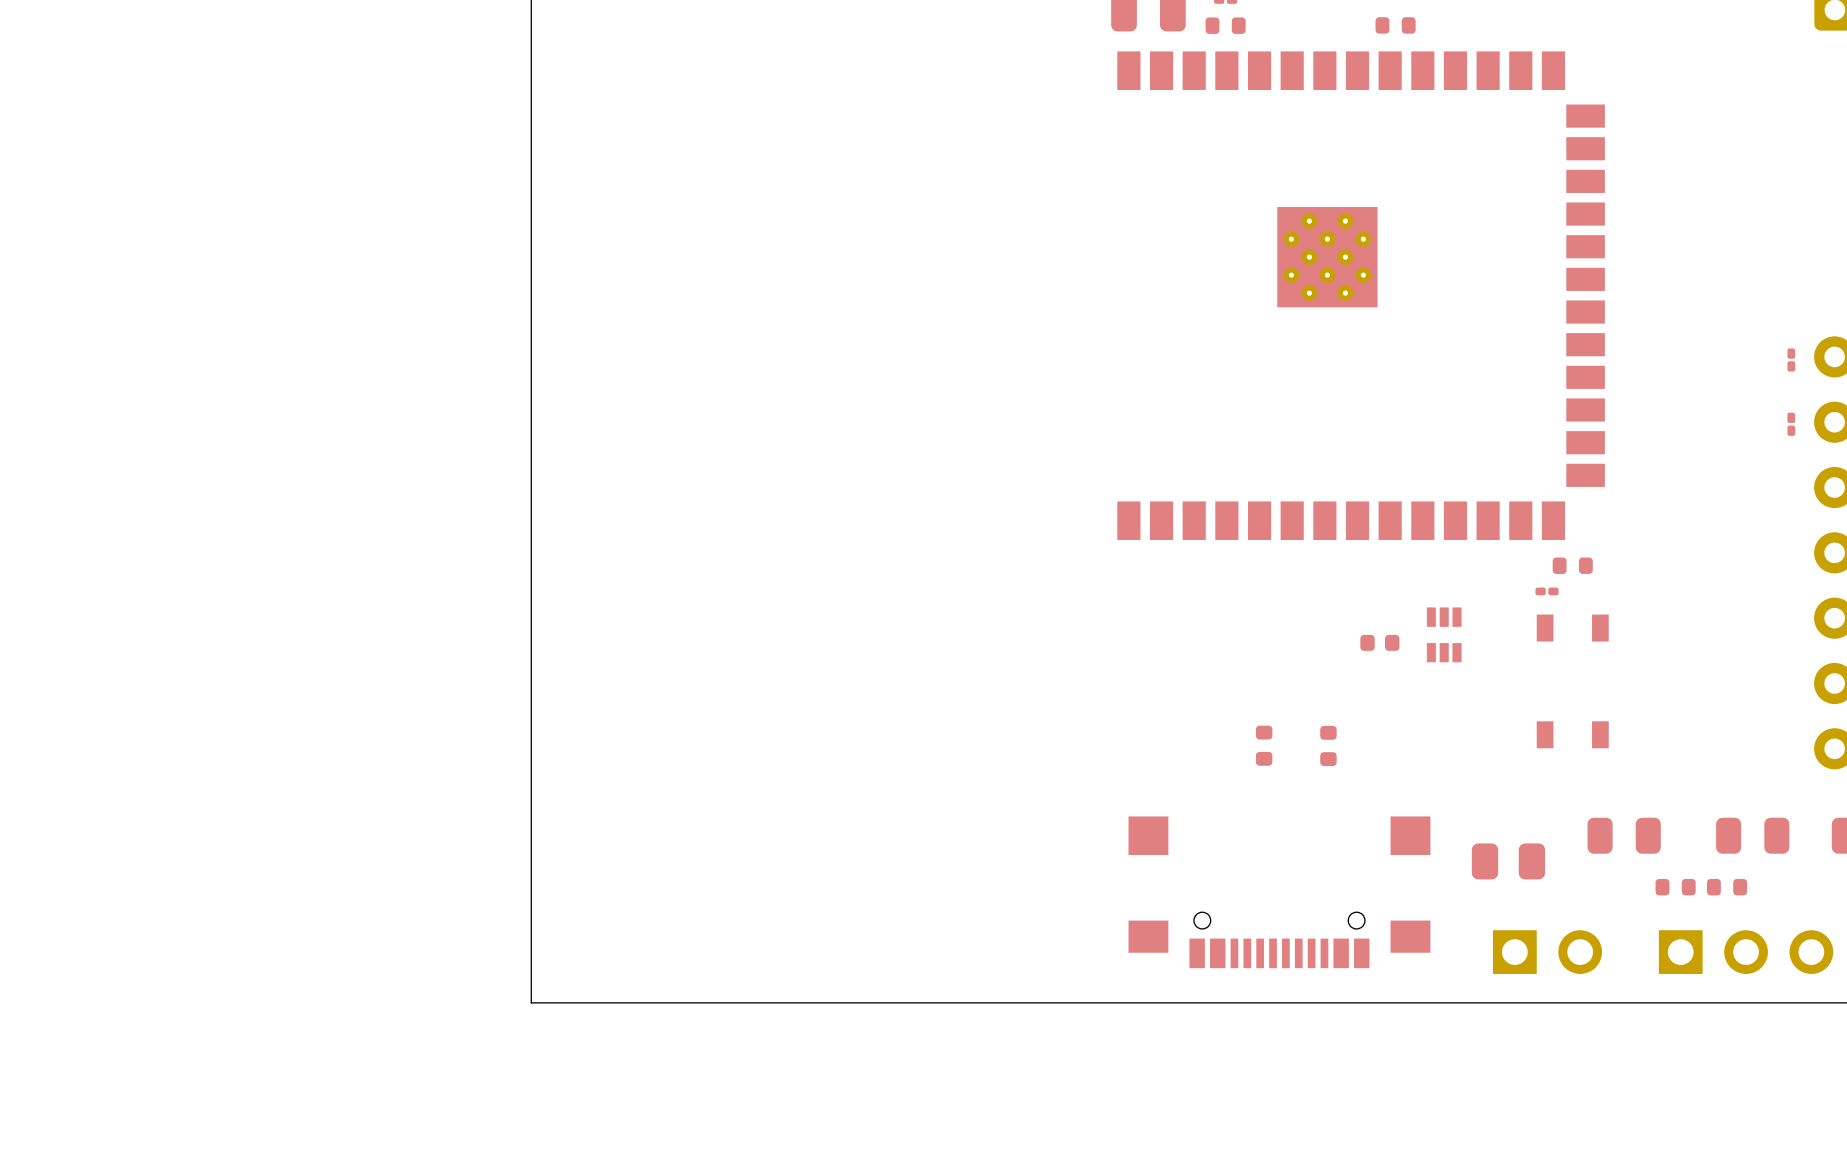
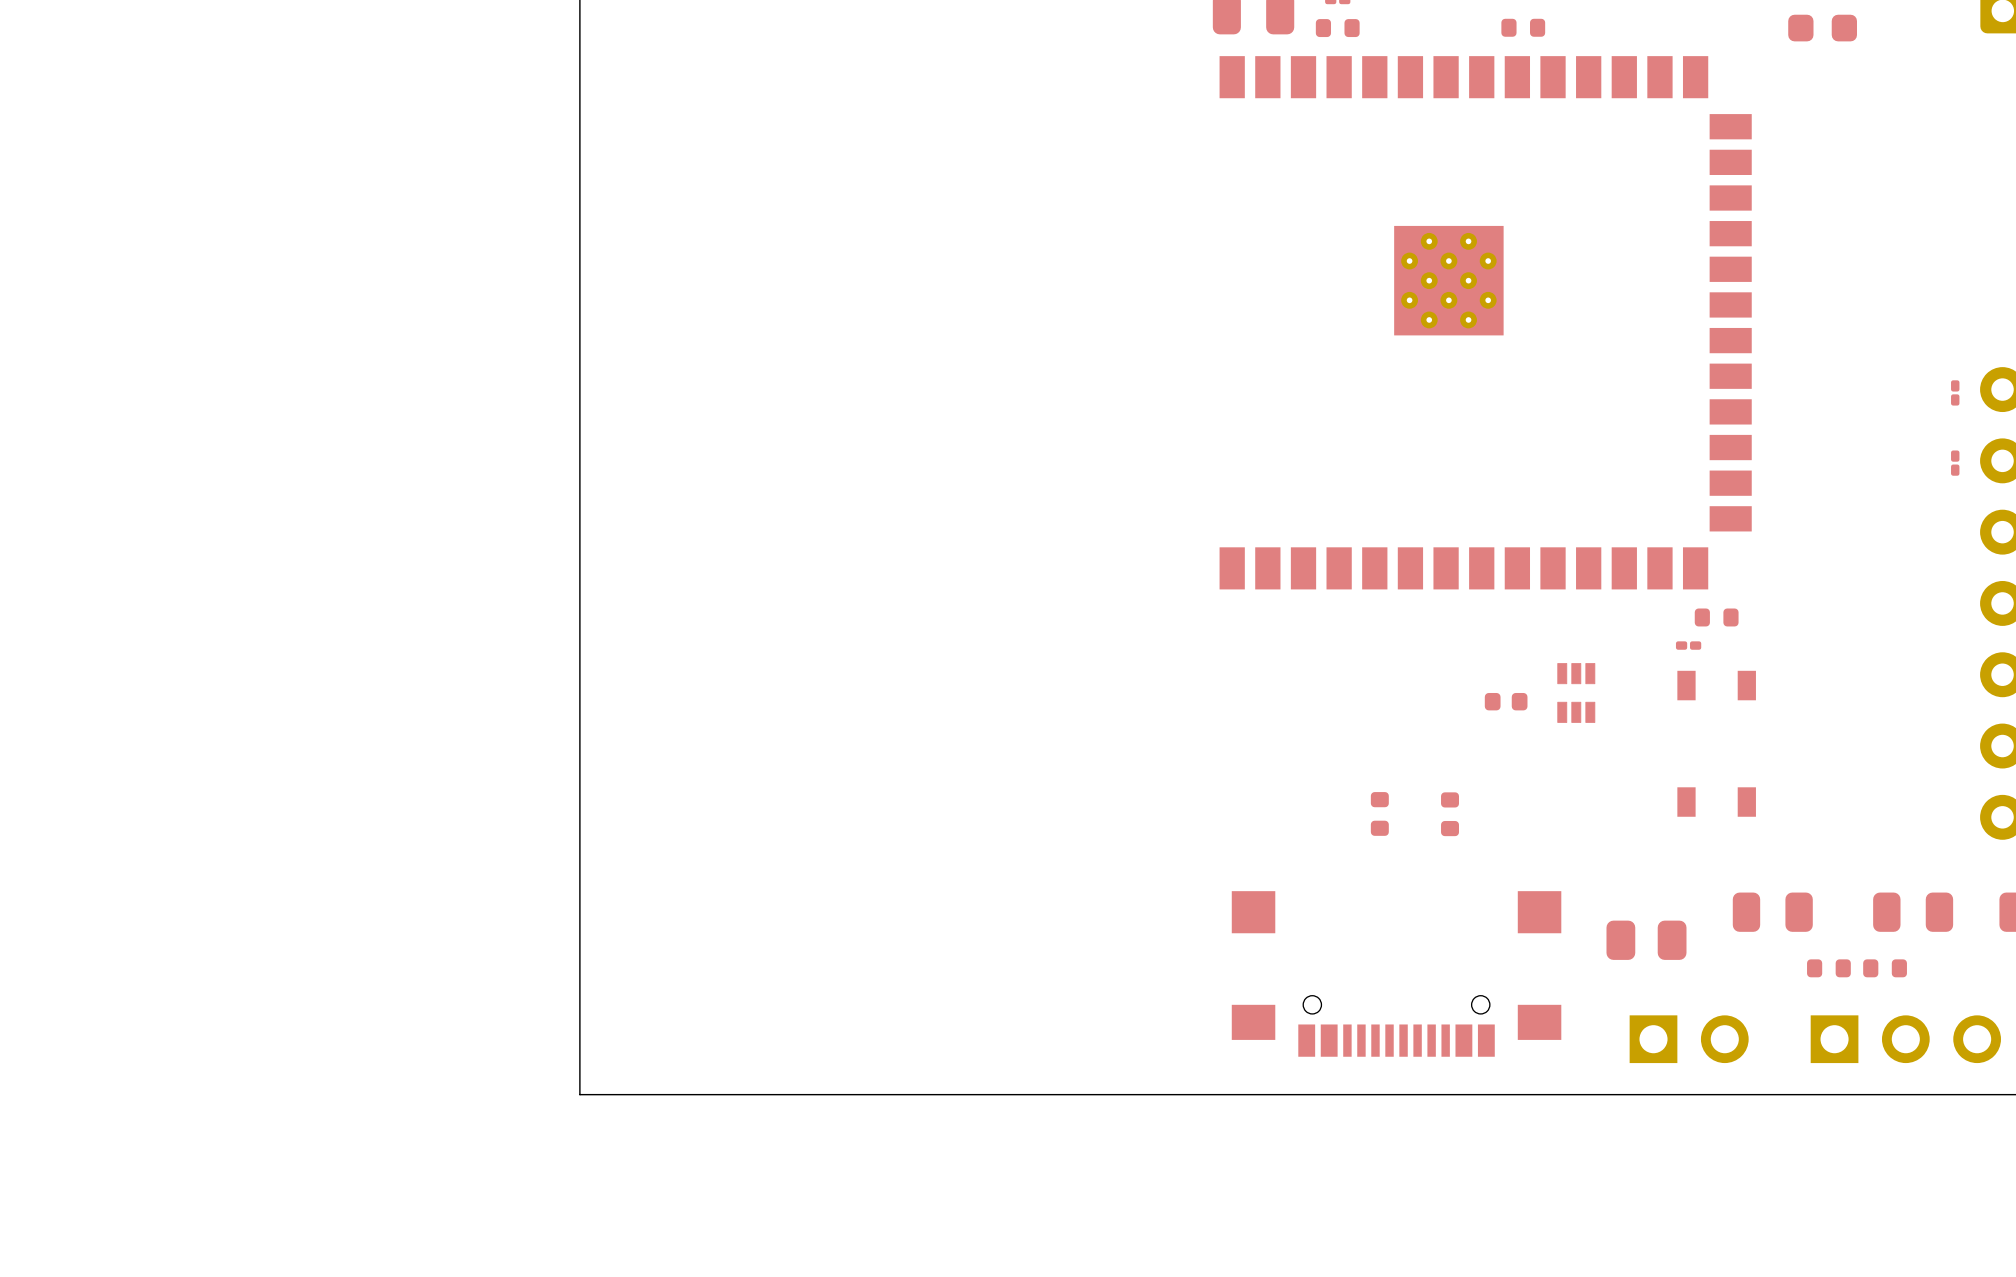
part: none -> (1822, 28)

